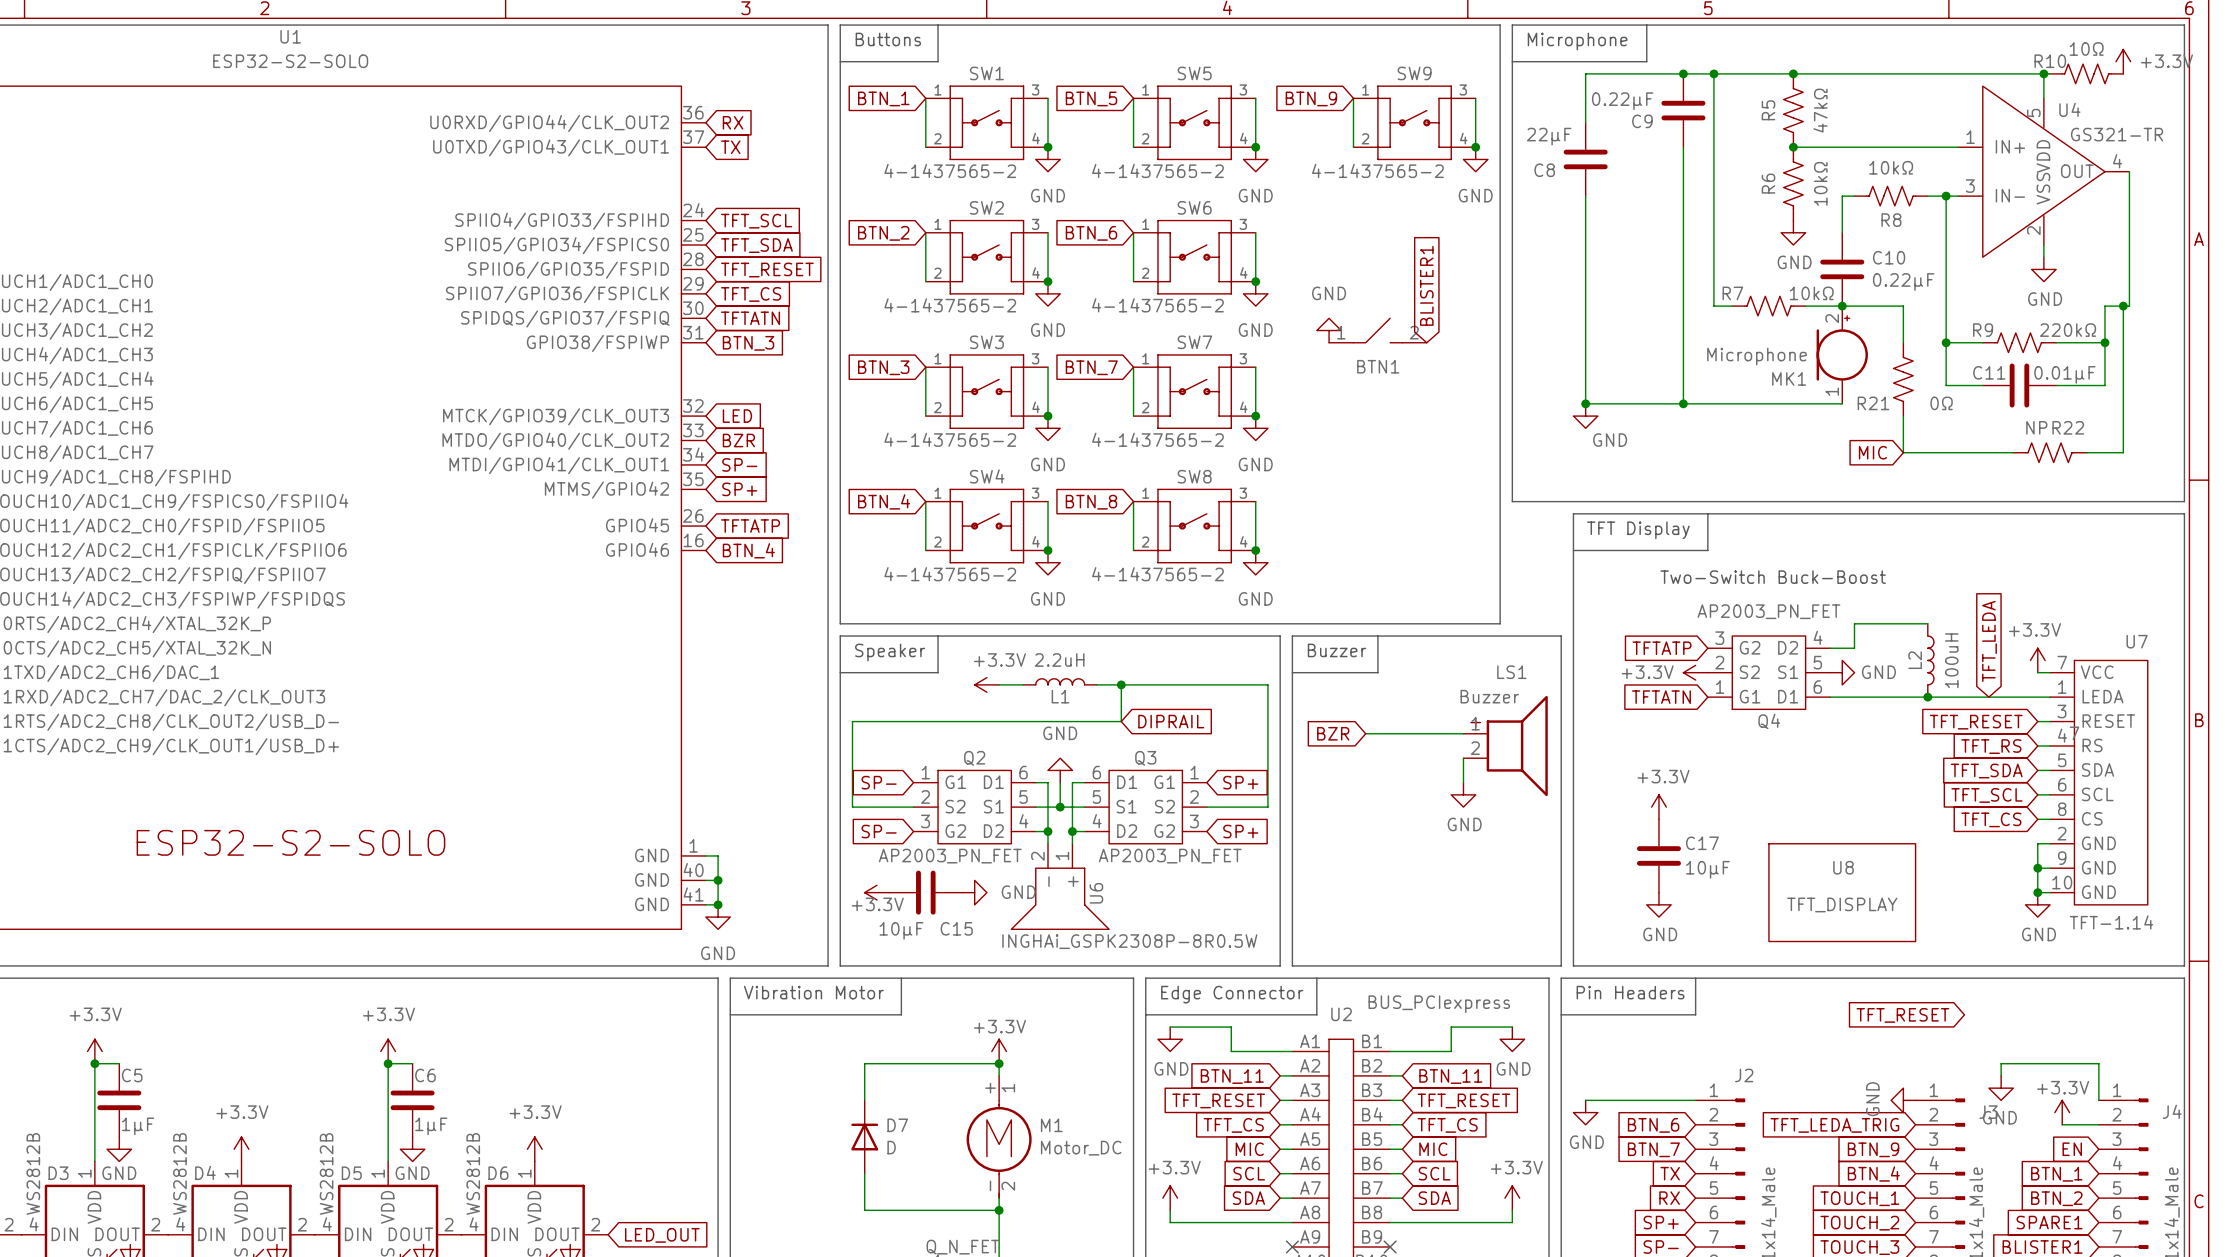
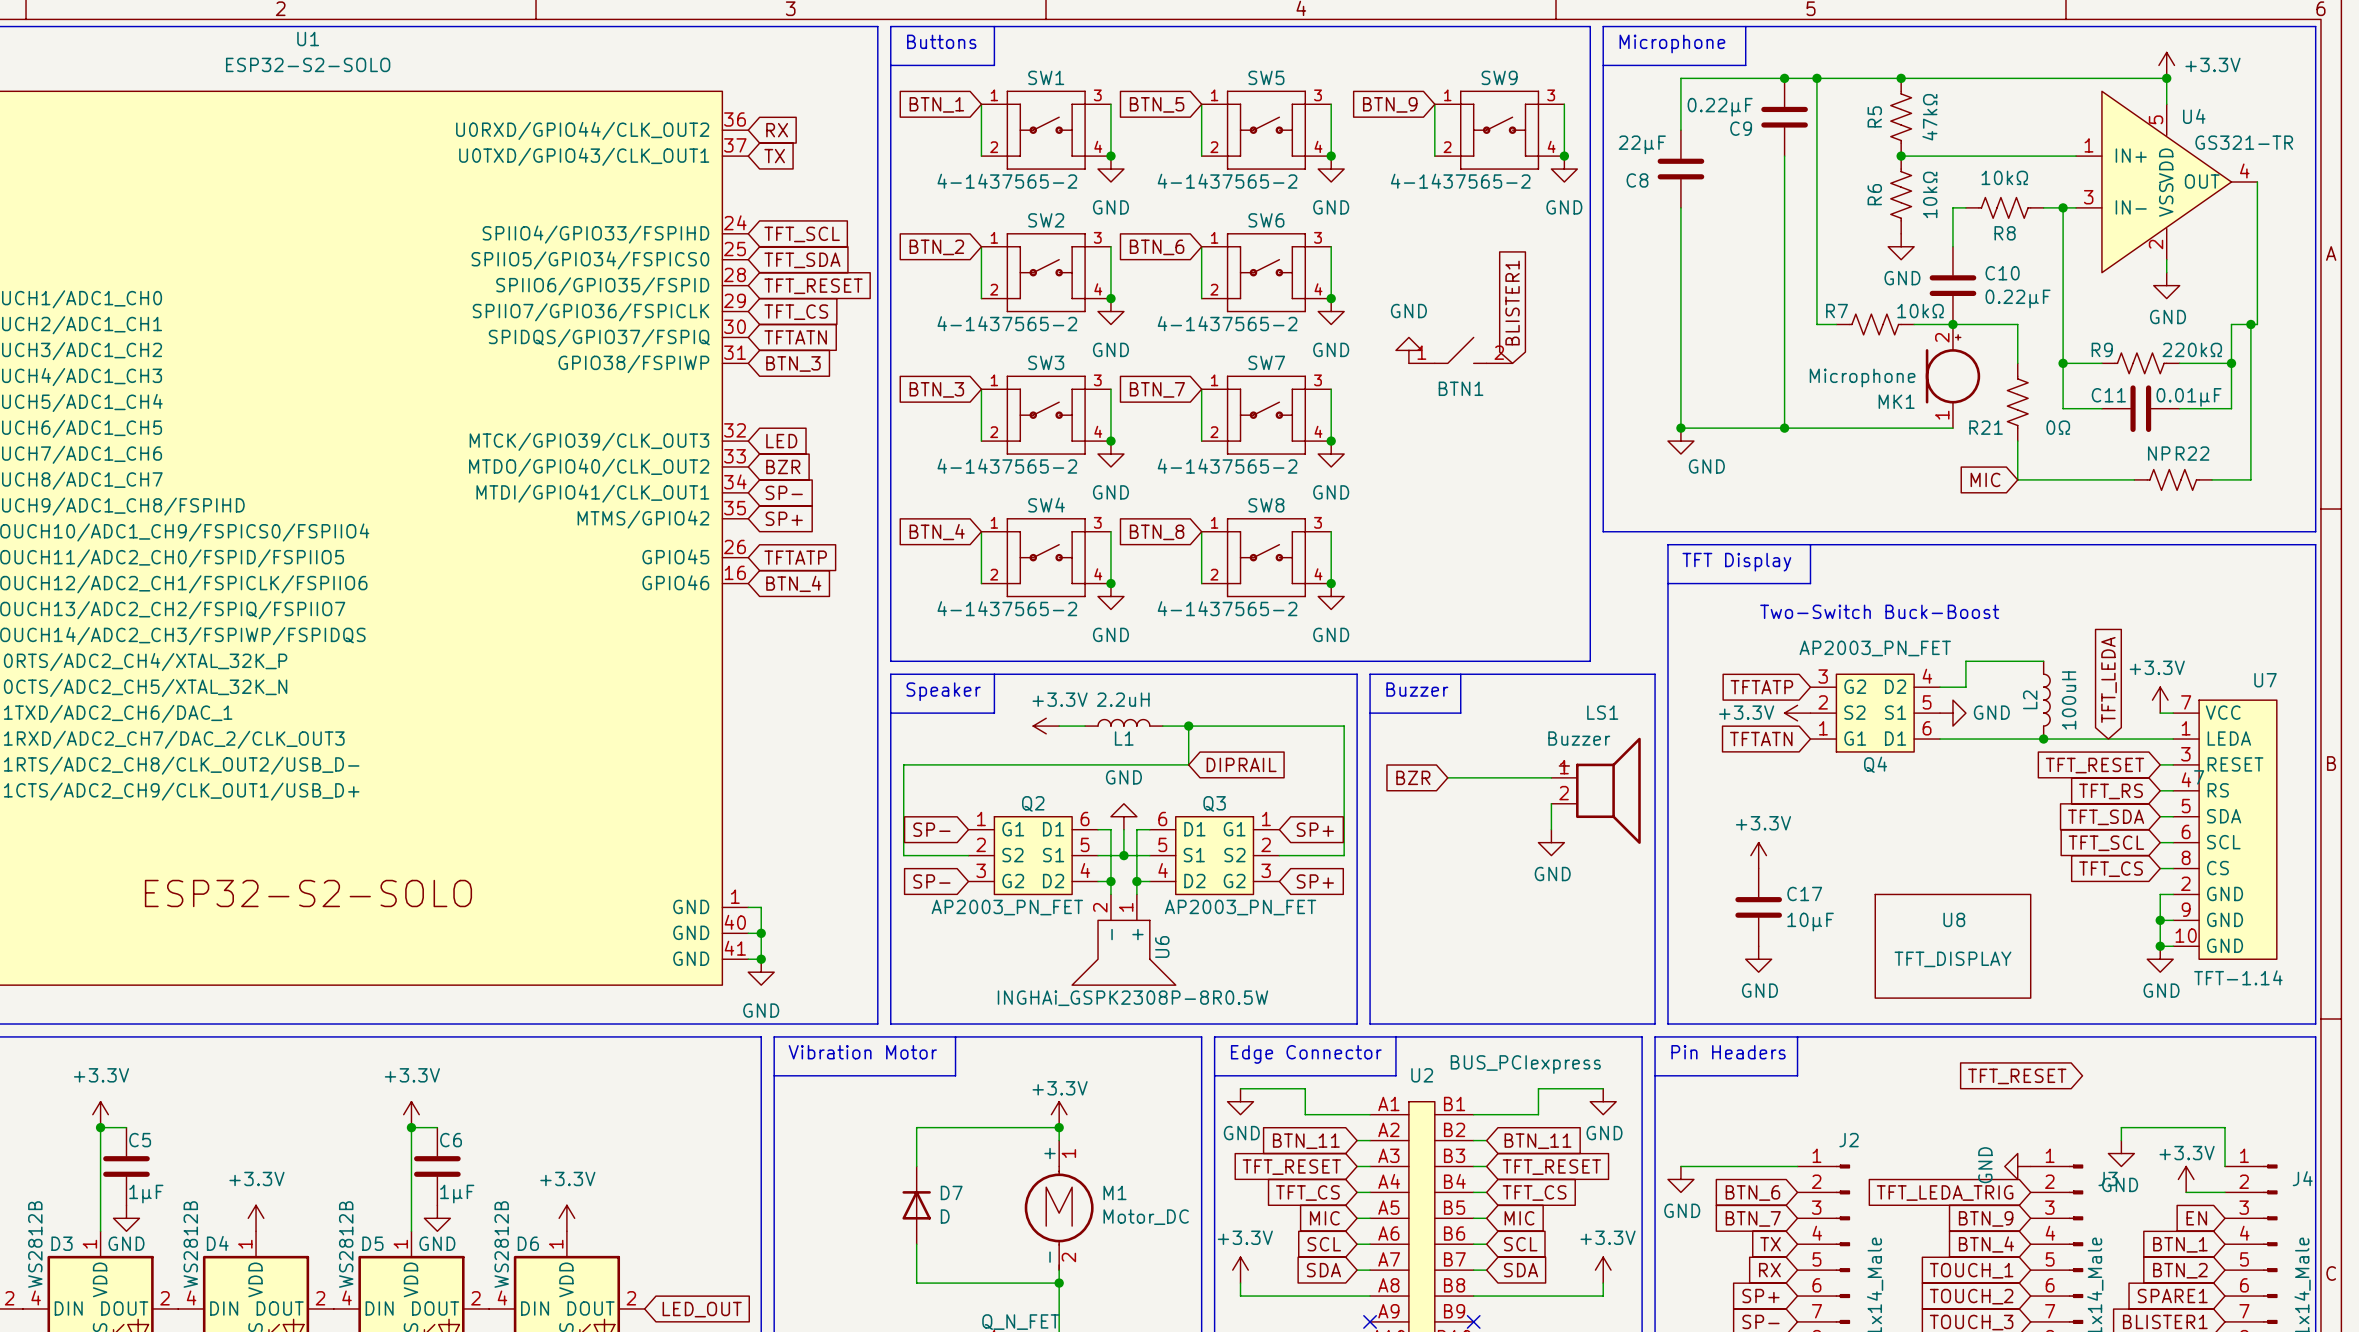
power symbol position: +3.3V (2123, 61) -> +3.3V (2166, 65)
R10: 10Ω (2086, 73) -> none
power symbol: +3.3V (876, 892) -> none
C15: 10μF (925, 892) -> none
power symbol: GND (974, 892) -> none
U6 value position: INGHAi_GSPK2308P-8R0.5W (1129, 941) -> INGHAi_GSPK2308P-8R0.5W (1132, 998)

